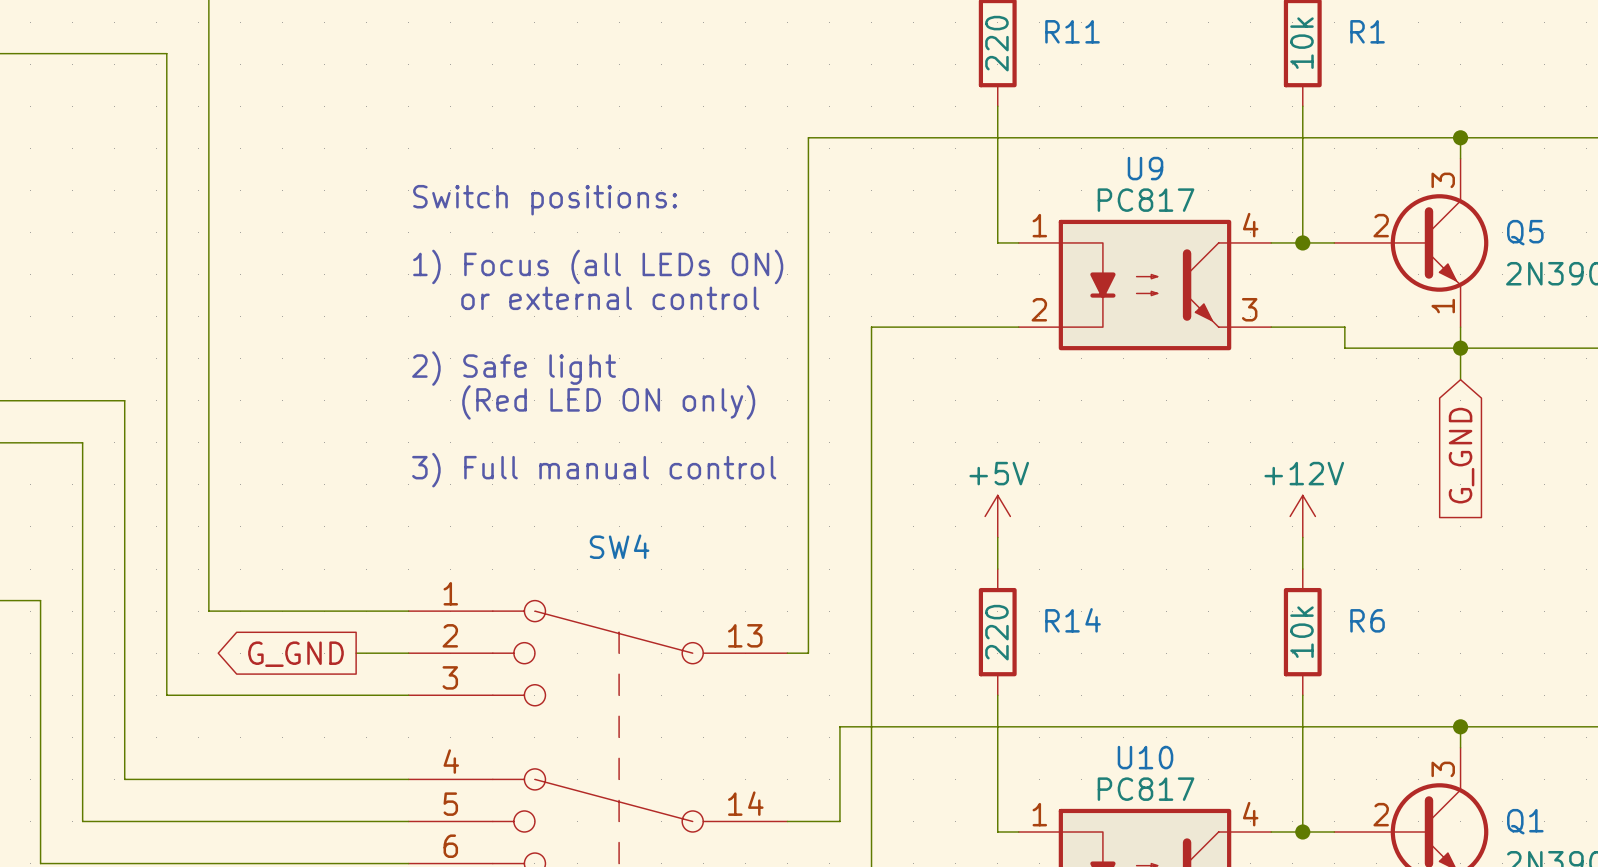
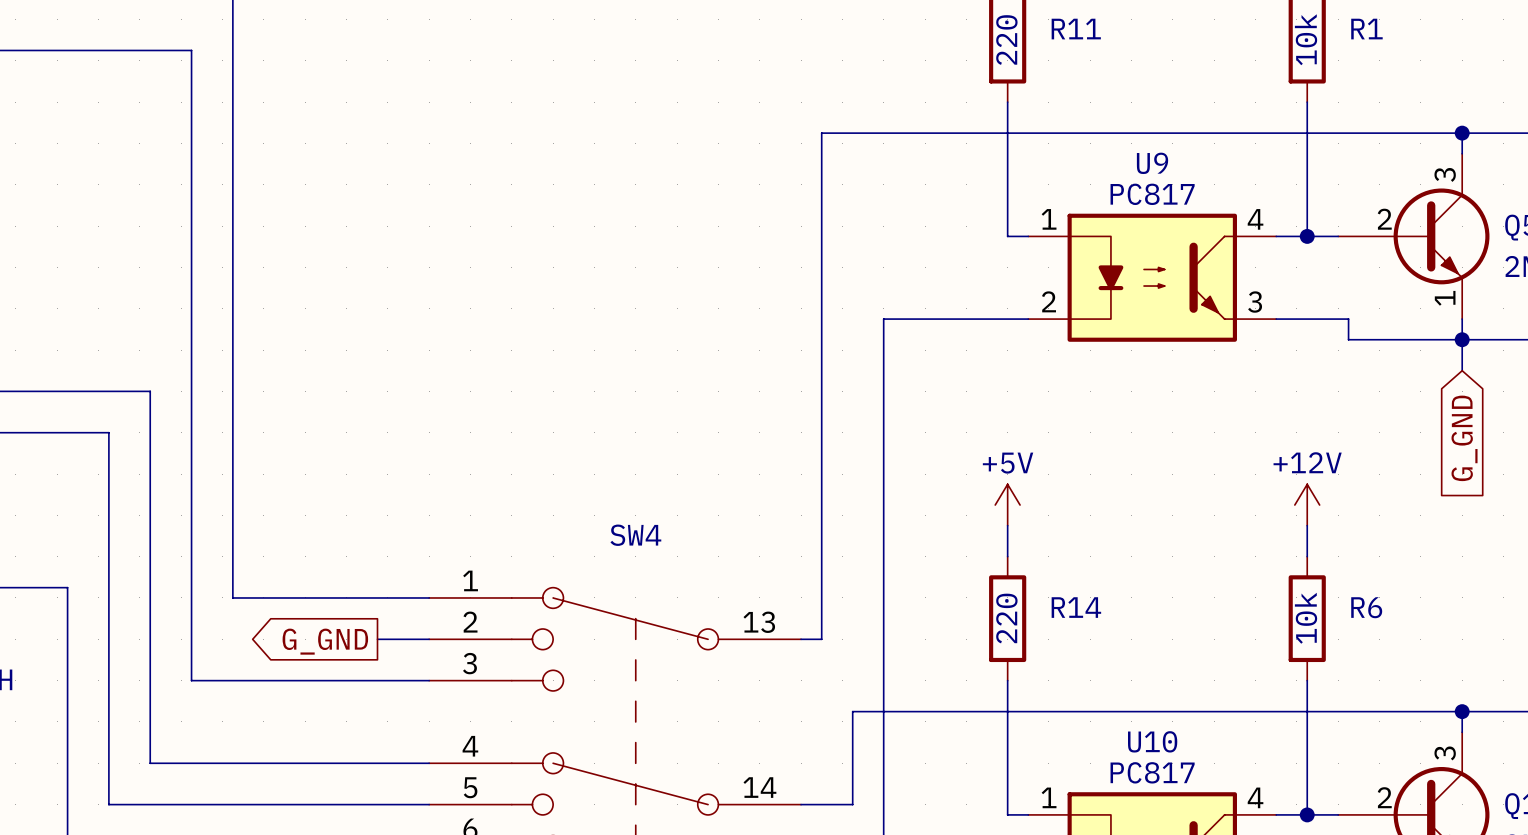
text: Switch positions: (545, 200) -> none
text: 1) Focus (all LEDs ON) (598, 266) -> none
text: or external control (610, 298) -> none
text: 2) Safe light (514, 368) -> none
text: (Red LED ON only) (608, 402) -> none
text: 3) Full manual control (594, 470) -> none

